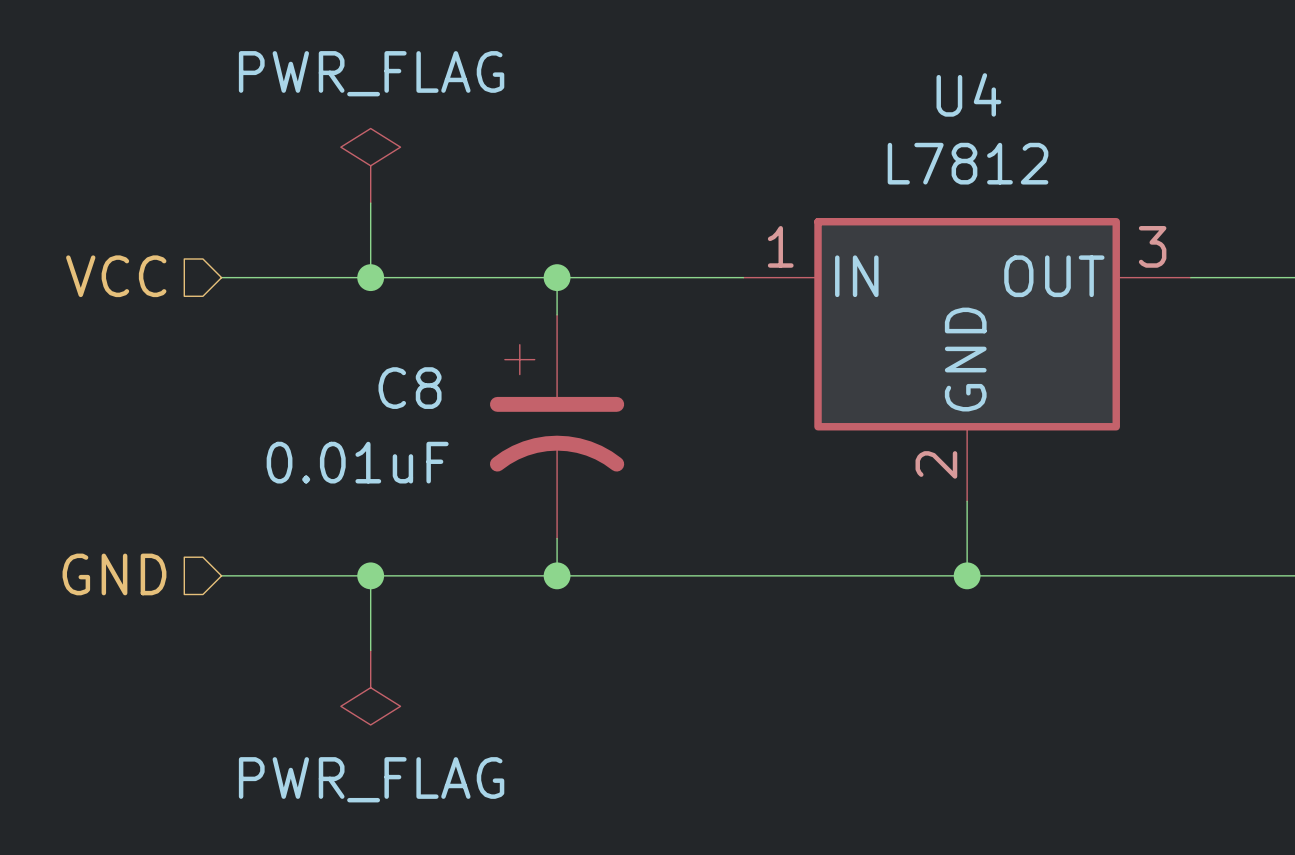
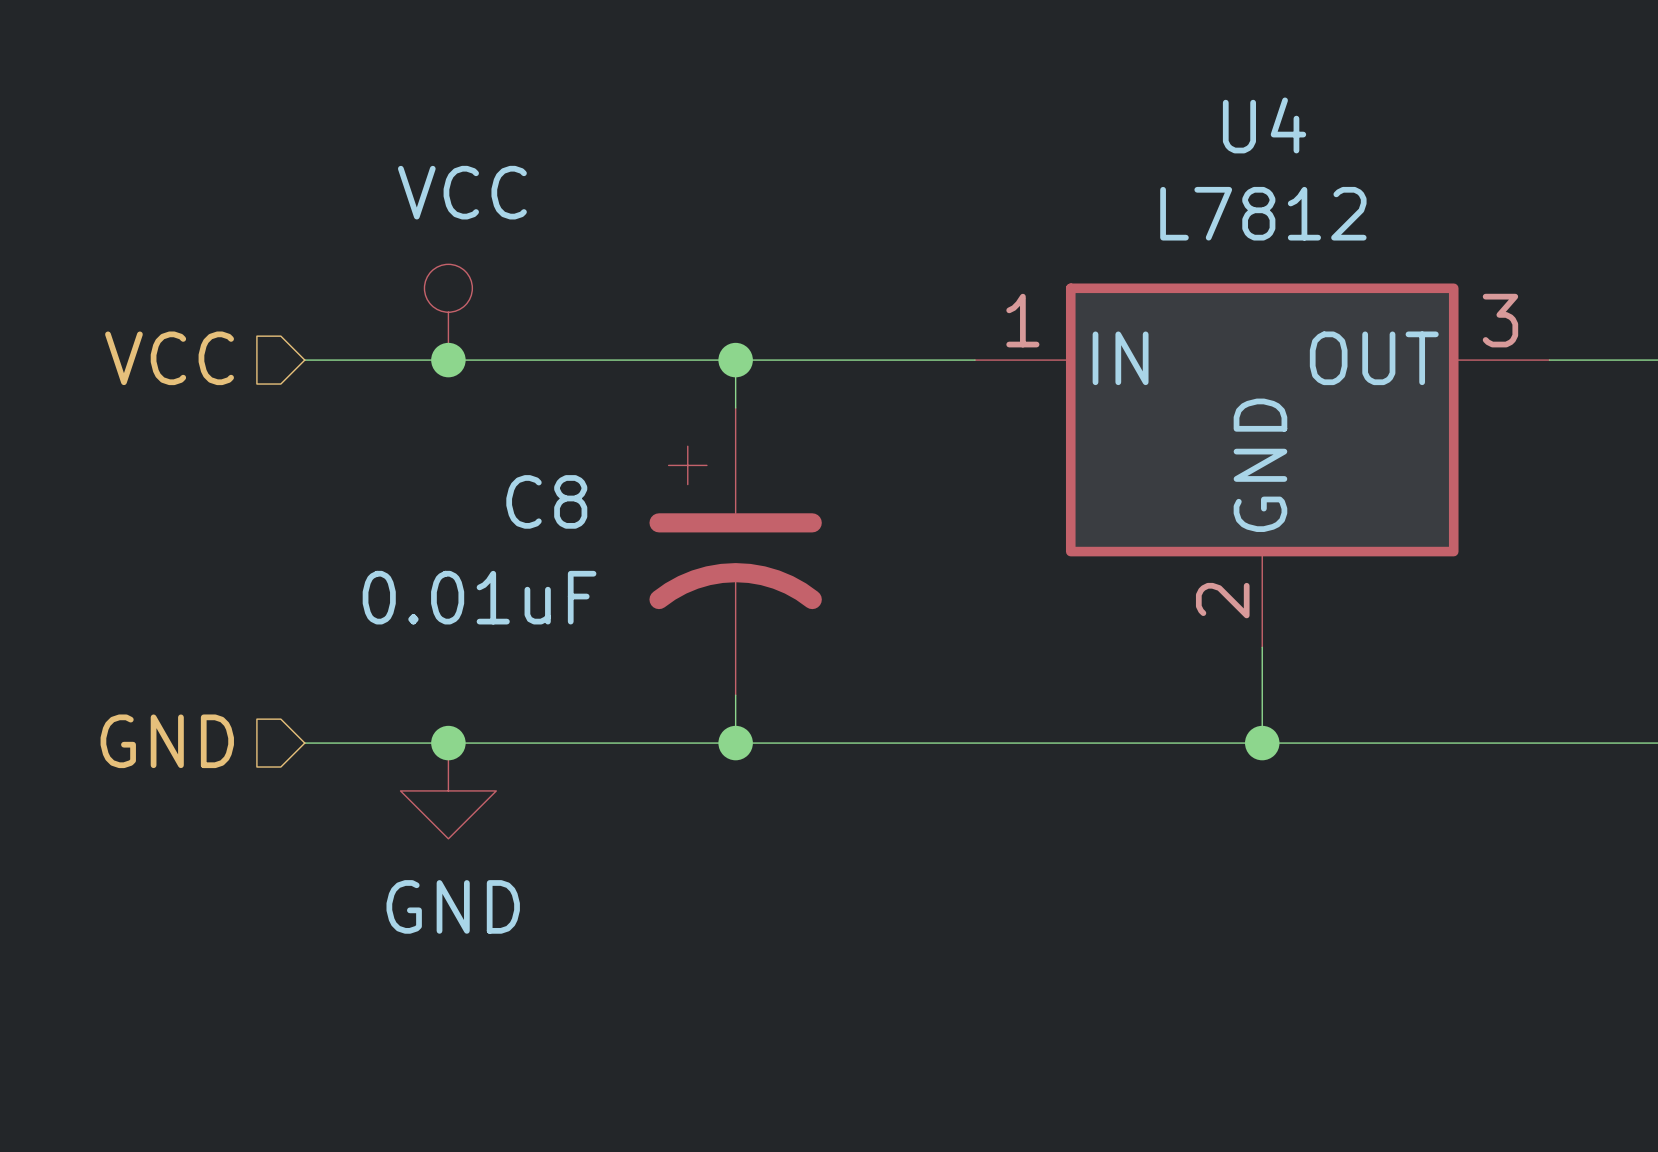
power symbol: PWR_FLAG (370, 165) -> none
wire: (370, 203) (370, 277) -> none
power symbol: none -> VCC (448, 312)
junction position: (370, 277) -> (448, 360)
wire: (370, 575) (370, 650) -> none
junction position: (370, 575) -> (448, 743)
power symbol: none -> GND (448, 790)
power symbol: PWR_FLAG (370, 687) -> none

